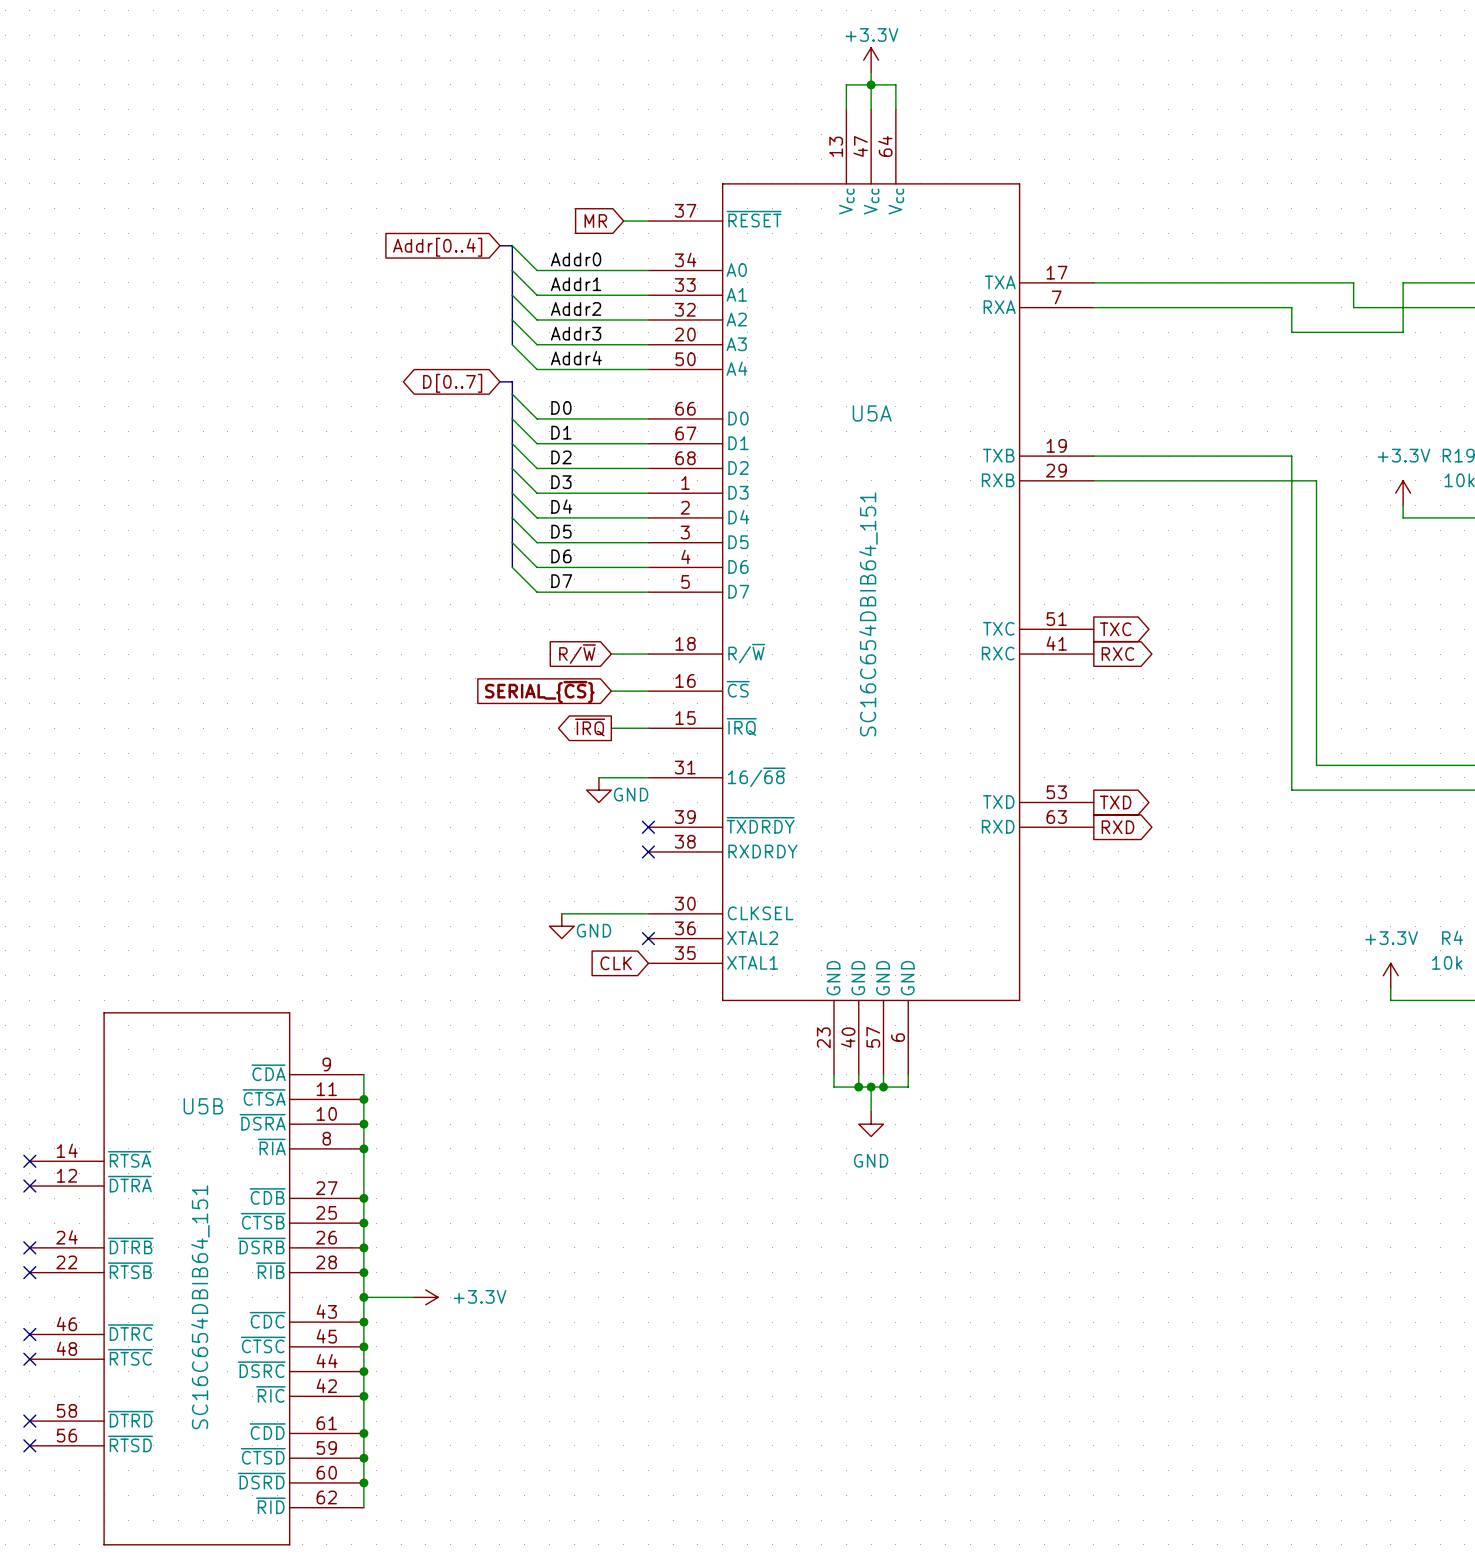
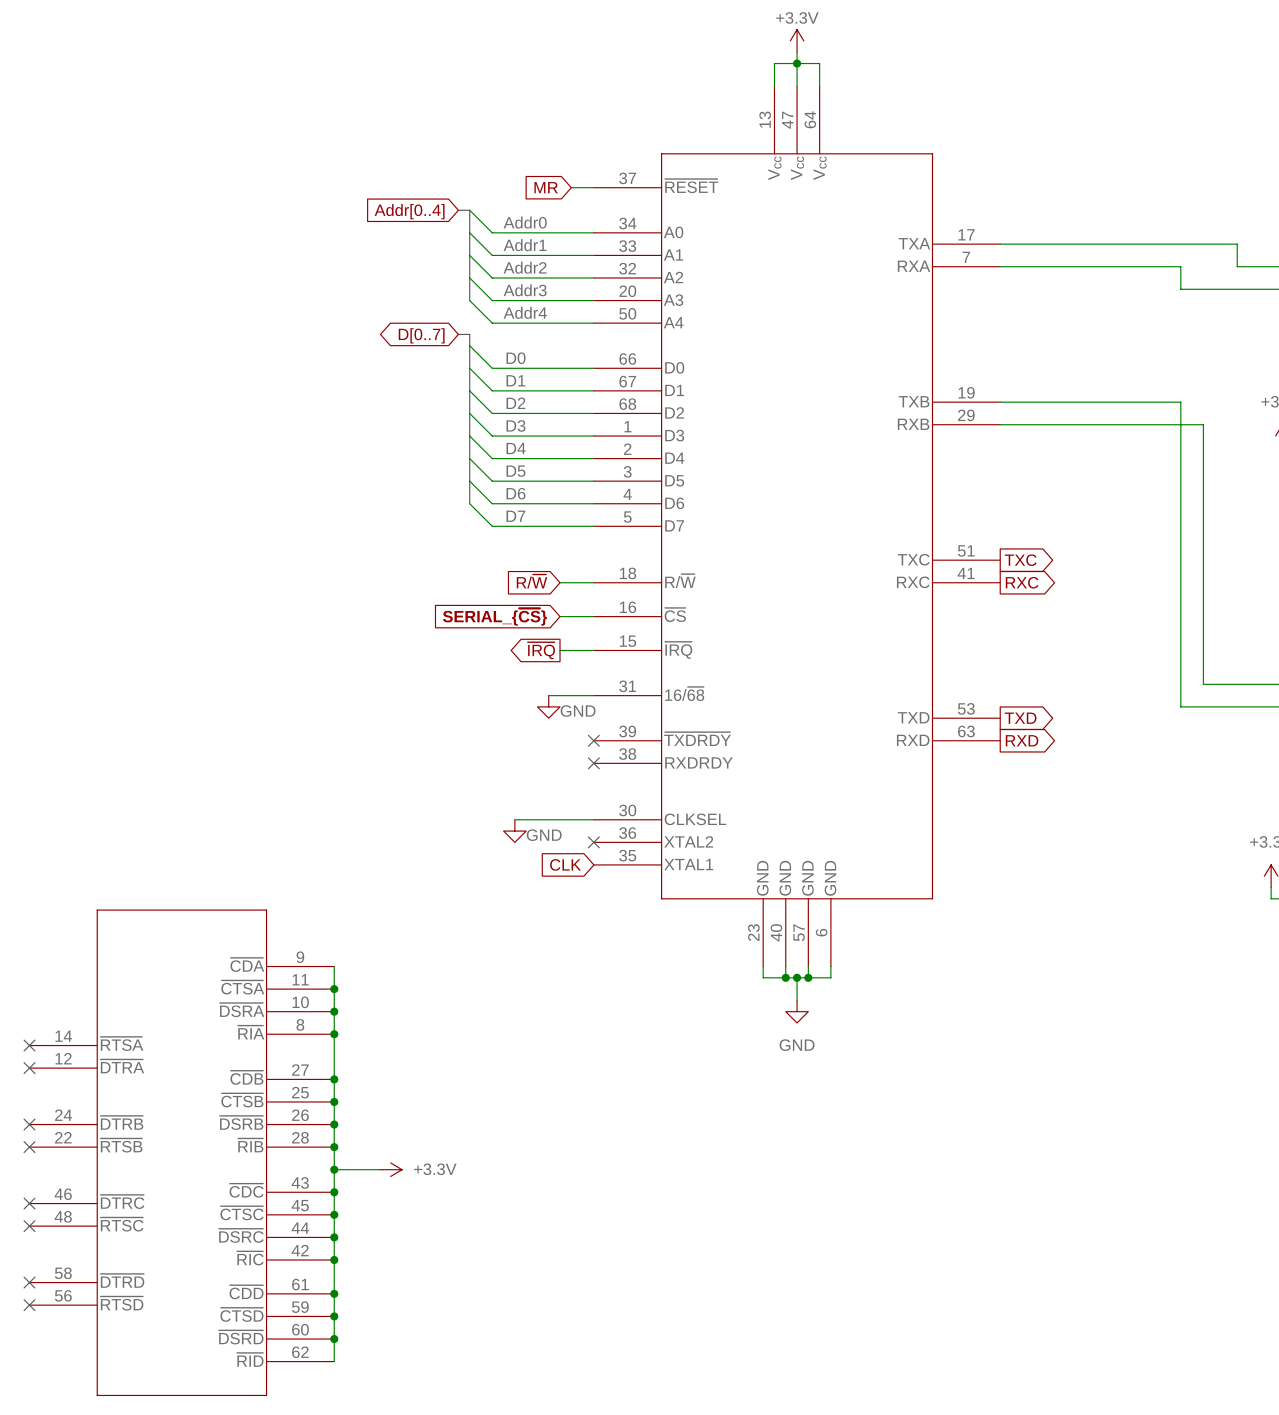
U5A name: U5A (872, 413) -> none
U5A value: SC16C654DBIB64_151 (868, 614) -> none
U5B name: U5B (203, 1106) -> none
U5B value: SC16C654DBIB64_151 (200, 1307) -> none

